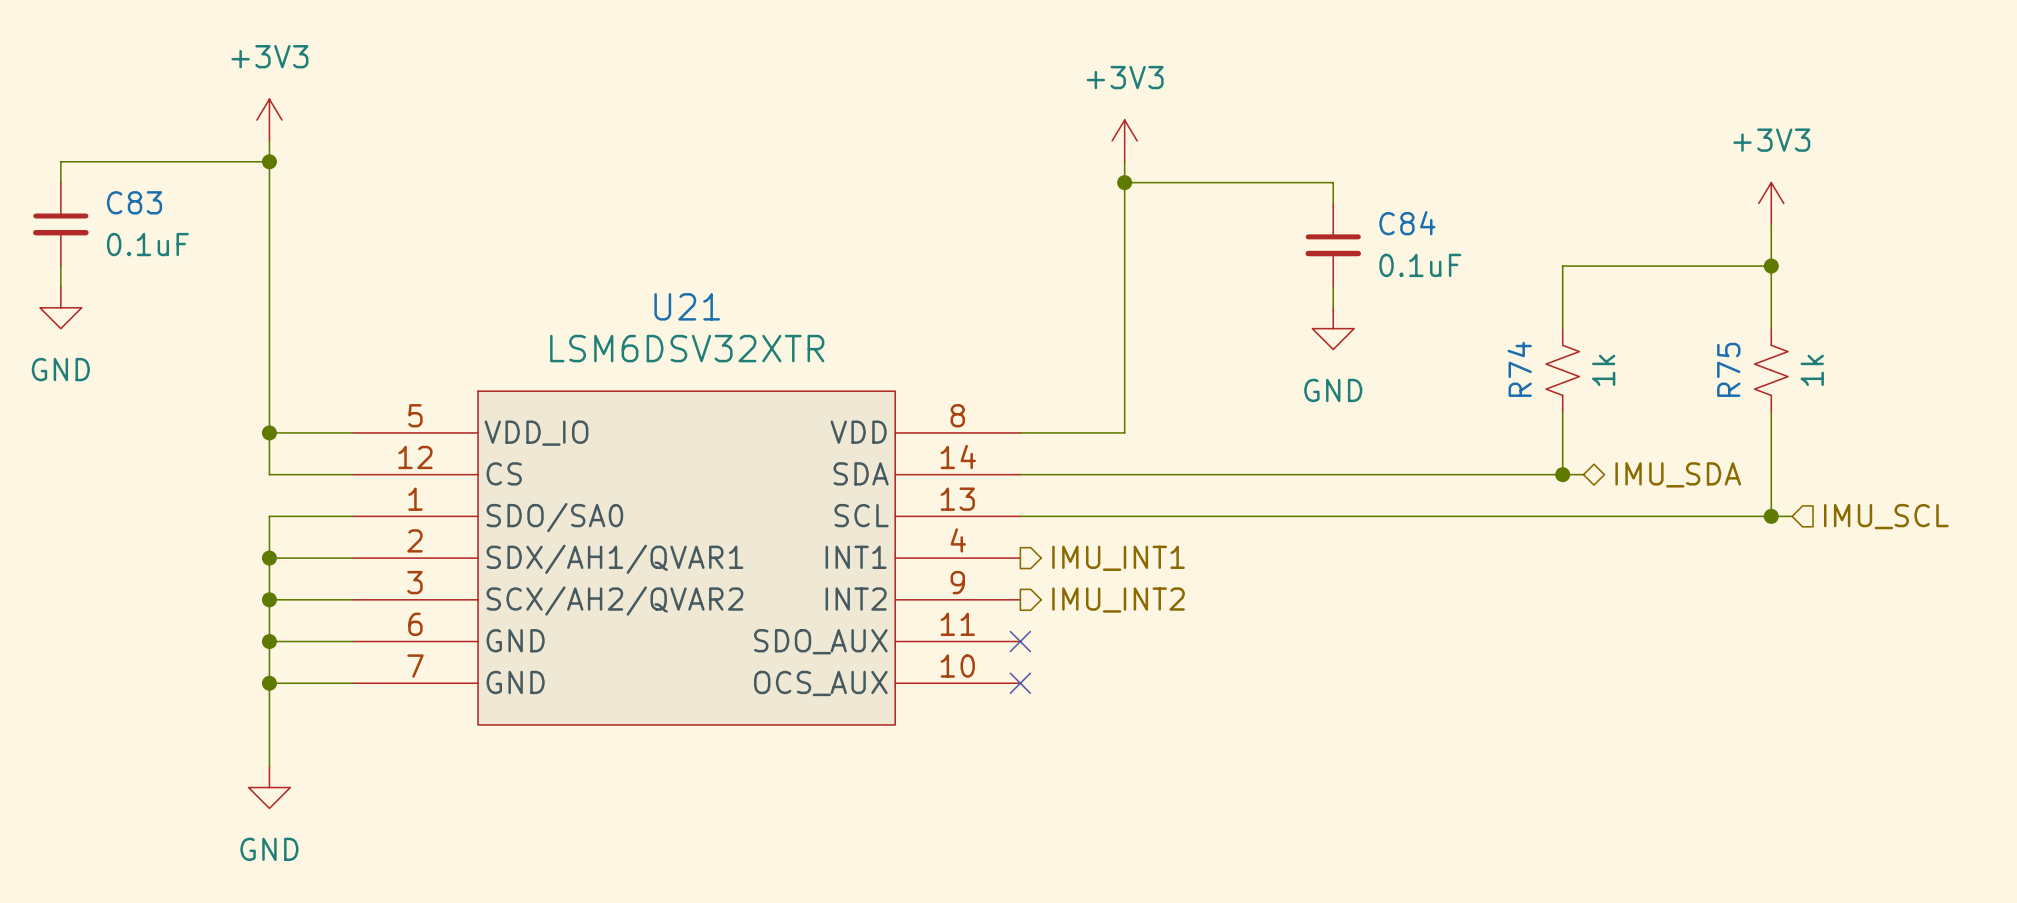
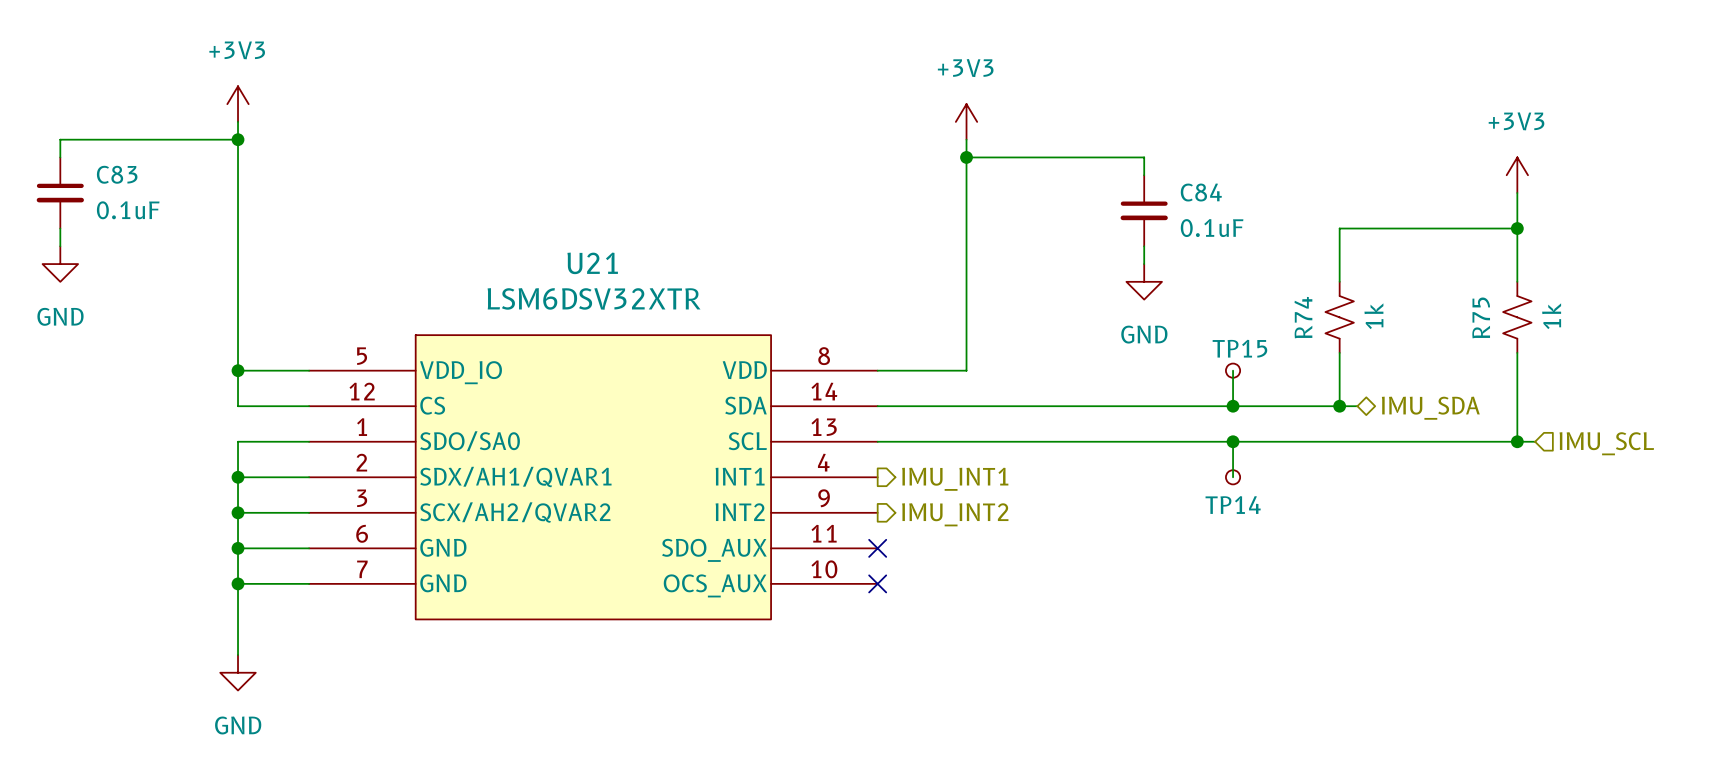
wire: none -> (1233, 370) (1233, 406)
TP15: none -> (1233, 370)
junction: none -> (1233, 406)
wire: none -> (1233, 441) (1233, 477)
junction: none -> (1233, 441)
TP14: none -> (1233, 477)

